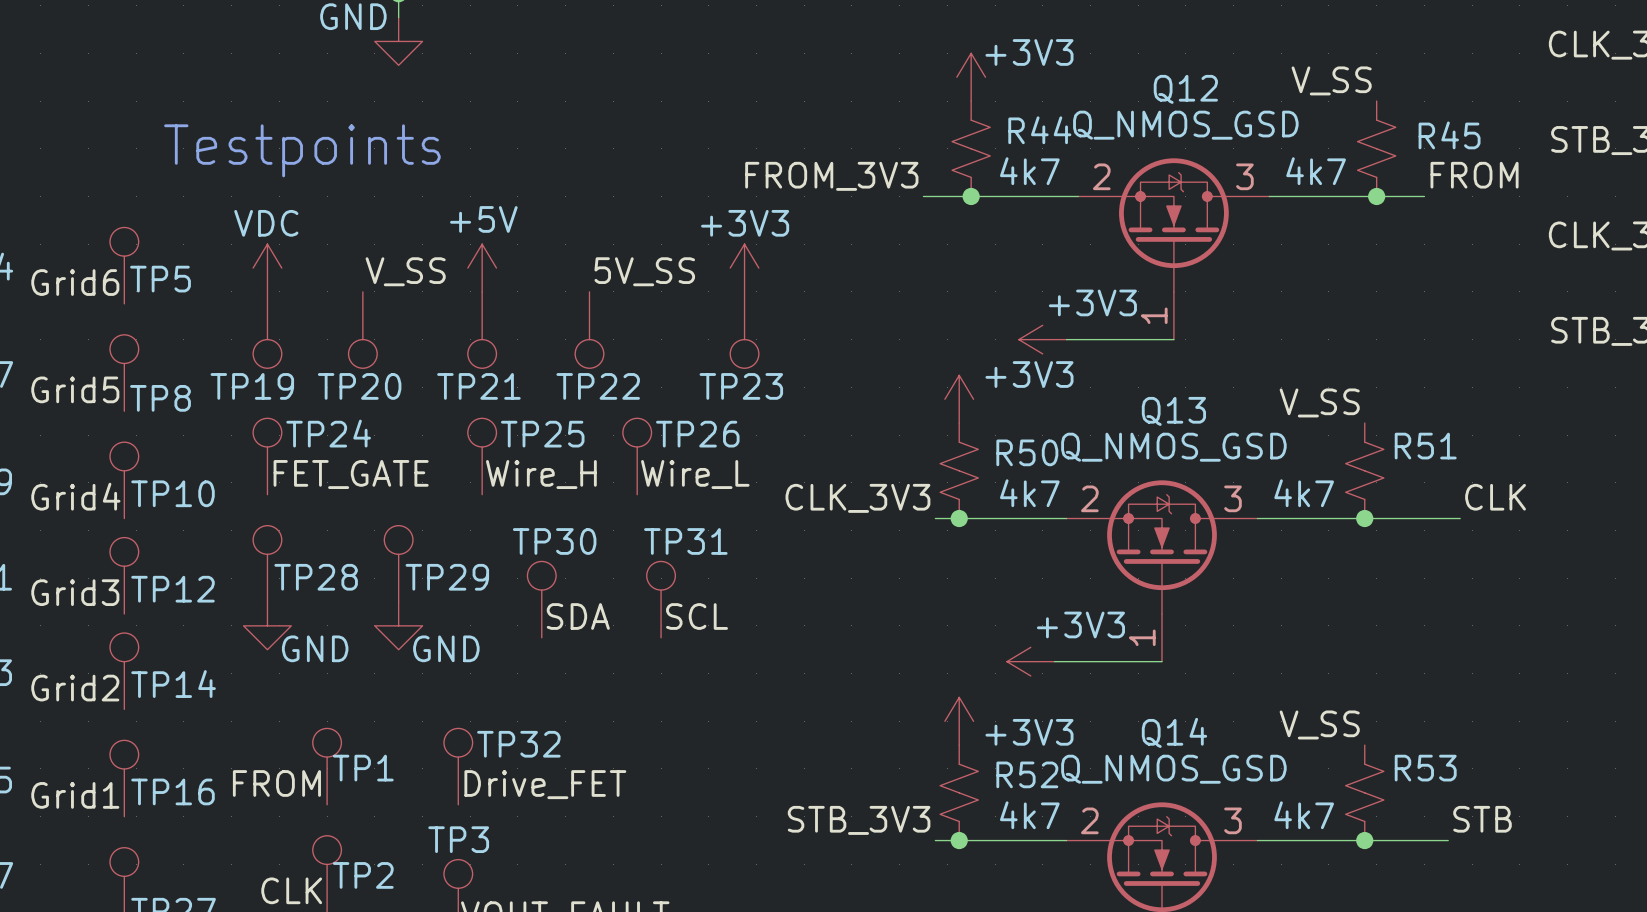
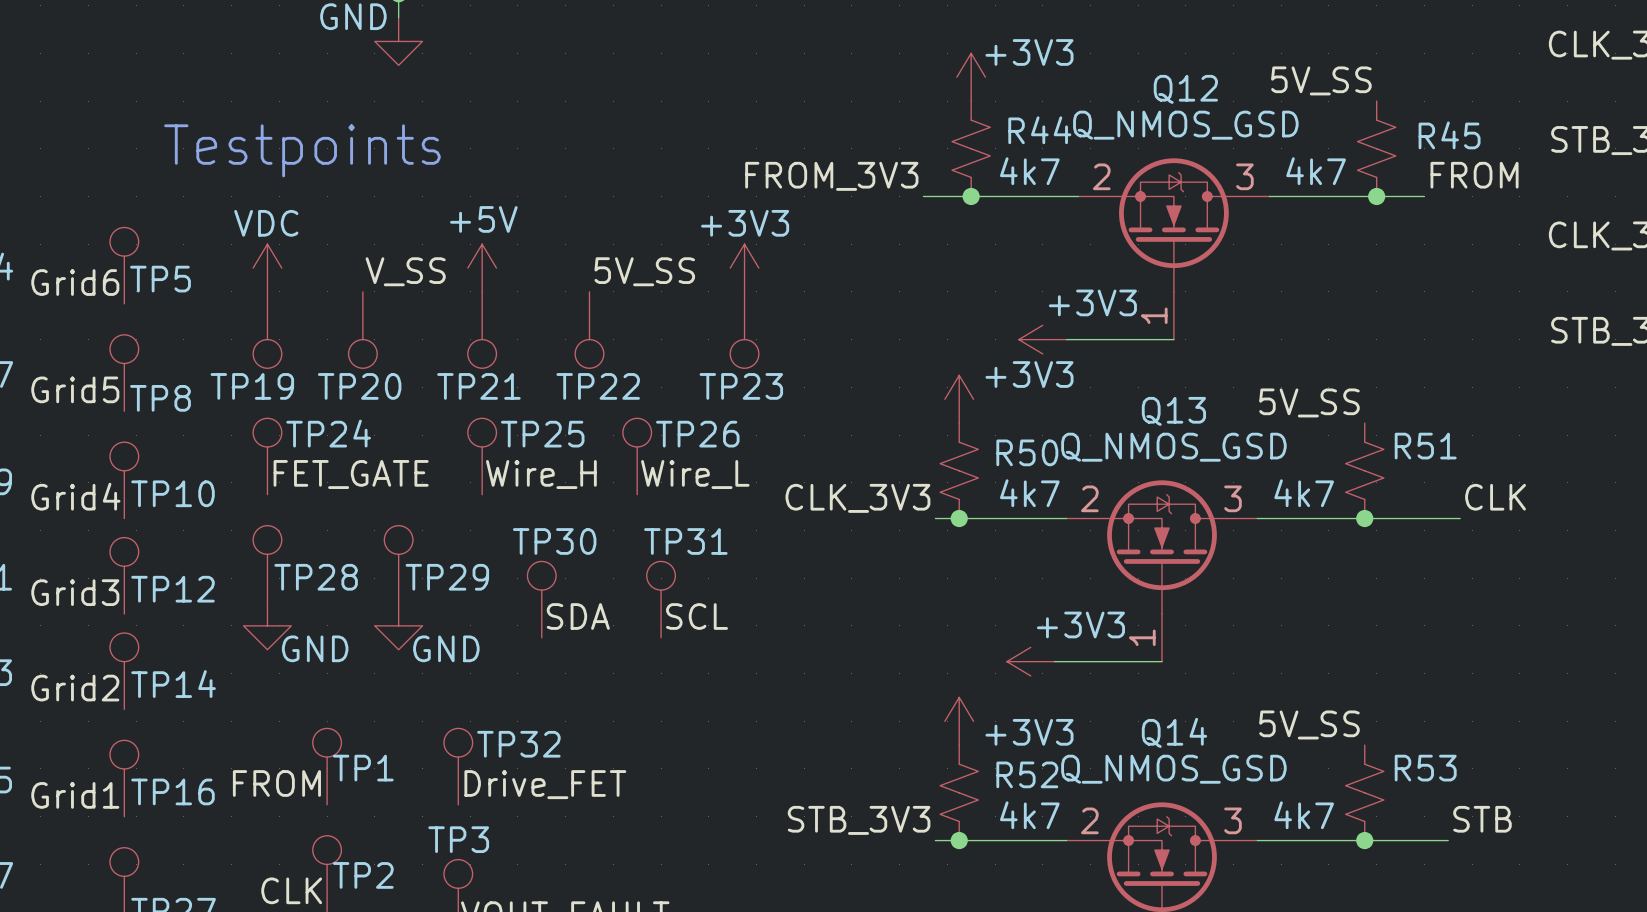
label: V_SS (1331, 80) -> 5V_SS (1321, 80)
label: V_SS (1319, 402) -> 5V_SS (1309, 402)
label: V_SS (1319, 724) -> 5V_SS (1309, 724)

